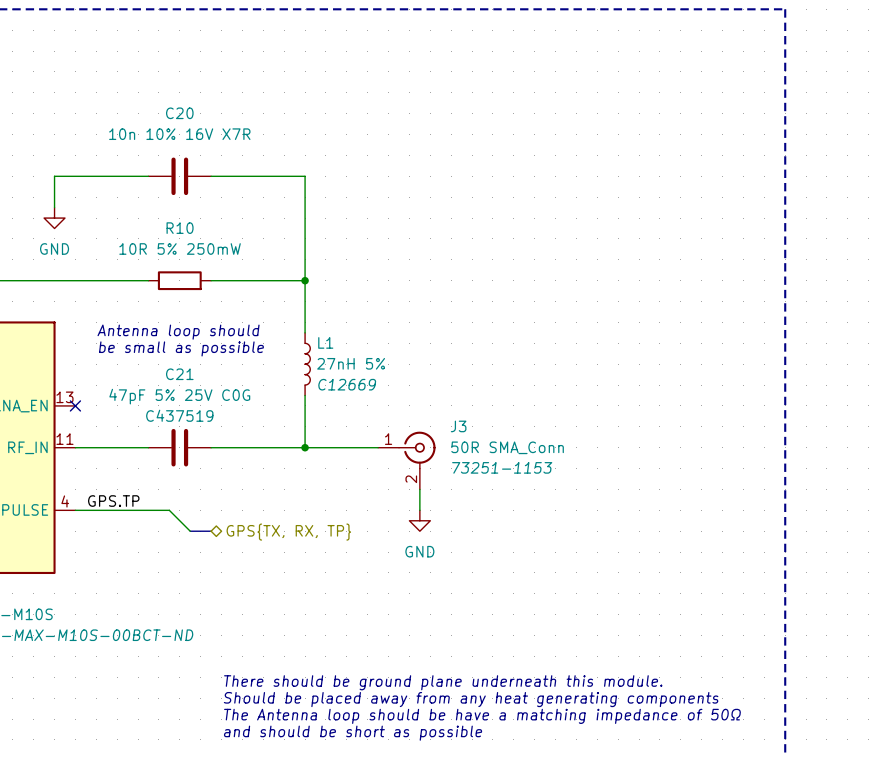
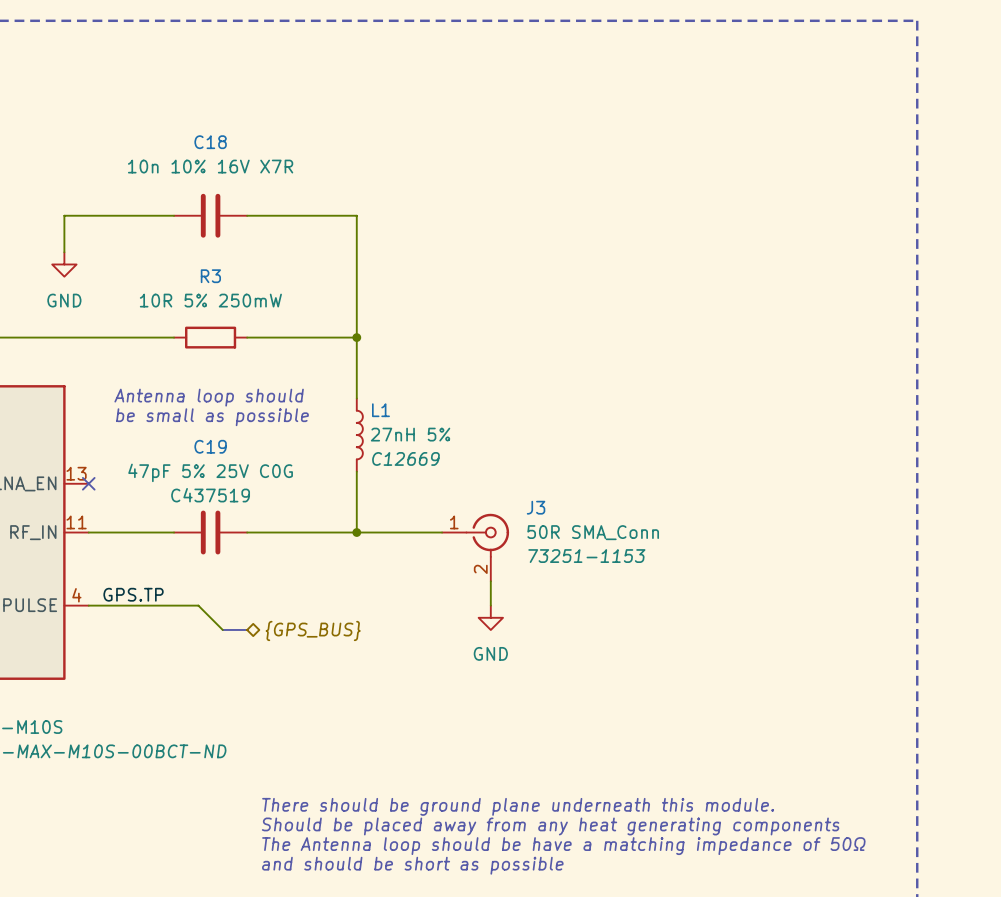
C20 name: C20 (179, 113) -> C18 (210, 142)
R10 name: R10 (180, 228) -> R3 (210, 276)
C21 name: C21 (179, 374) -> C19 (210, 446)
hierarchical label: GPS{TX, RX, TP} (288, 532) -> {GPS_BUS} (313, 630)

